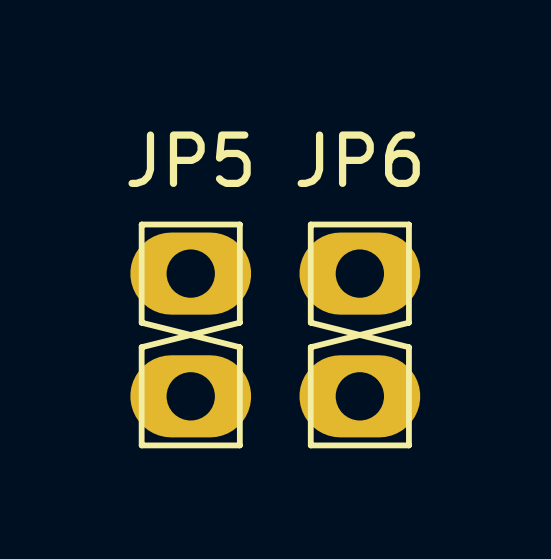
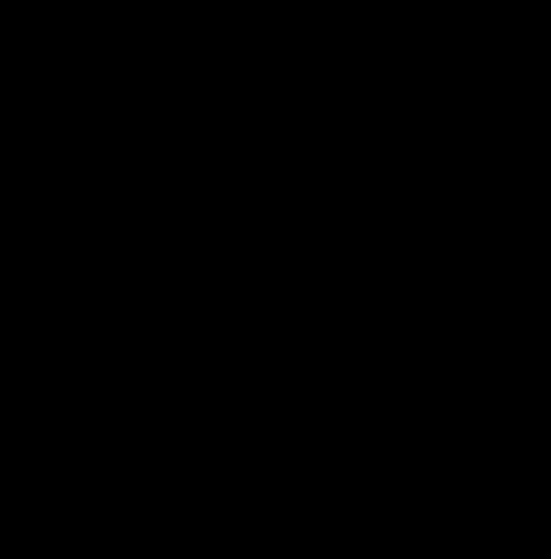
JP5: (190, 334) -> none
JP6: (359, 334) -> none

